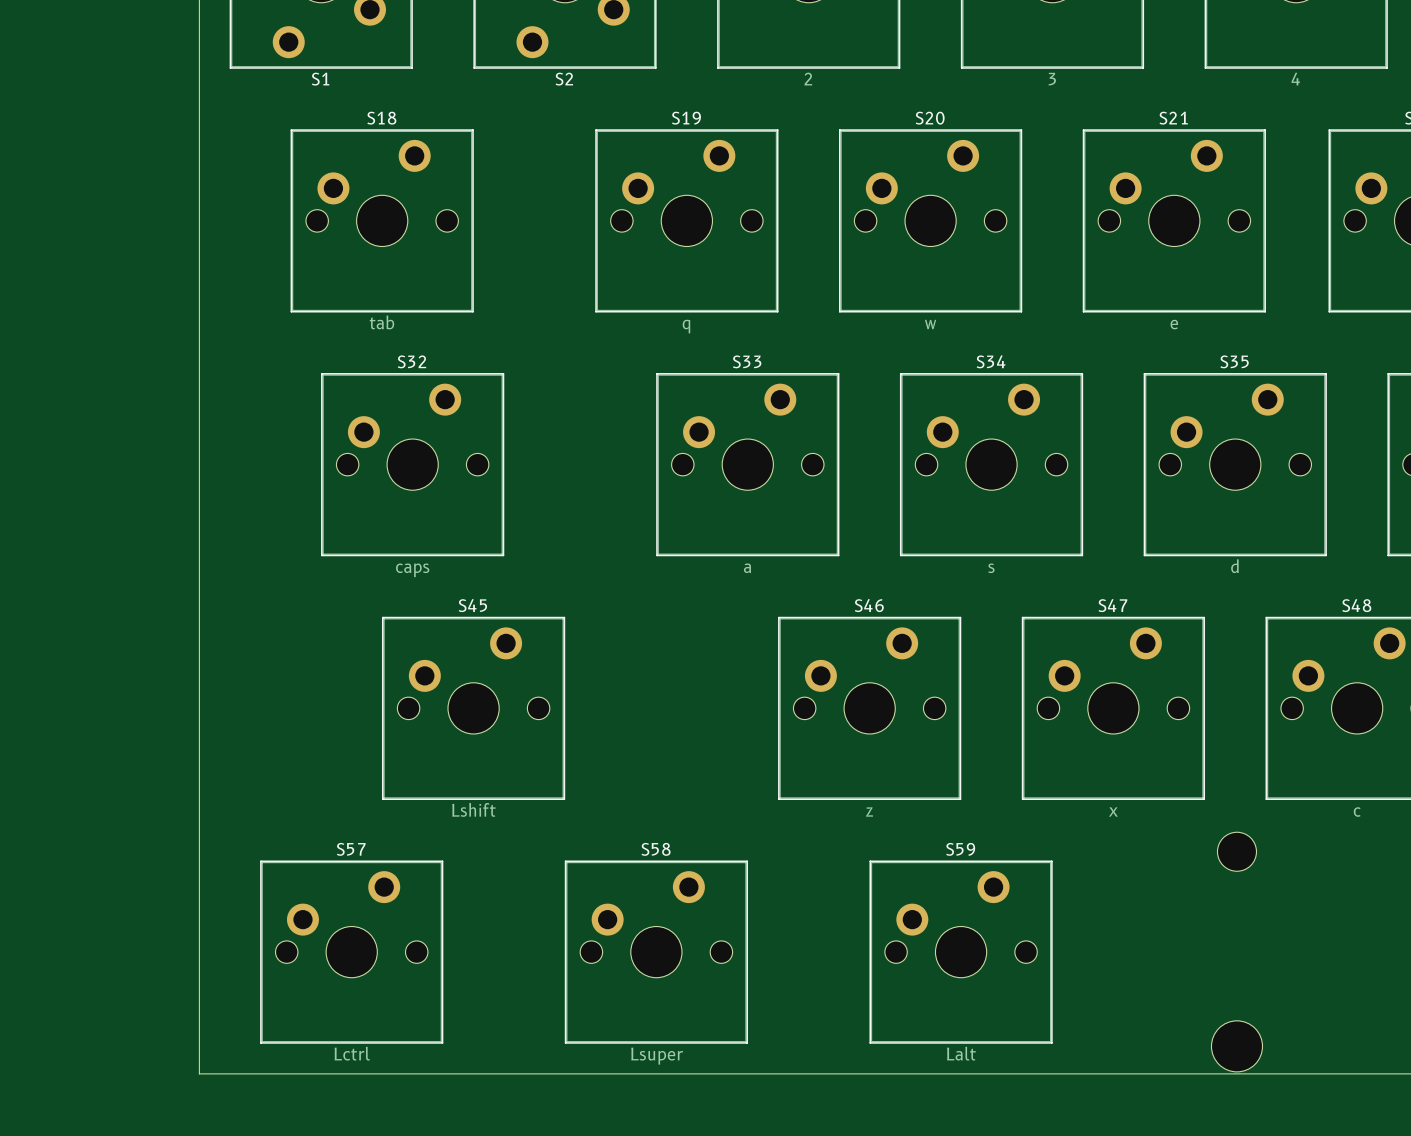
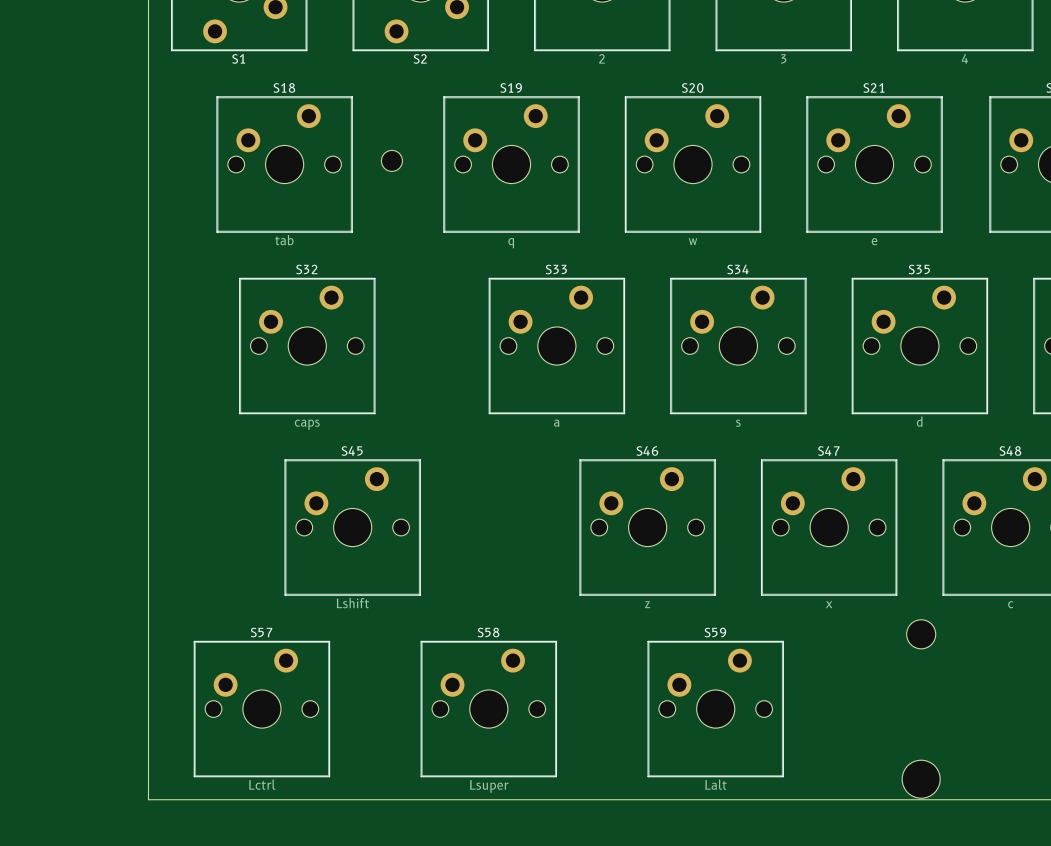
part: none -> (391, 160)

